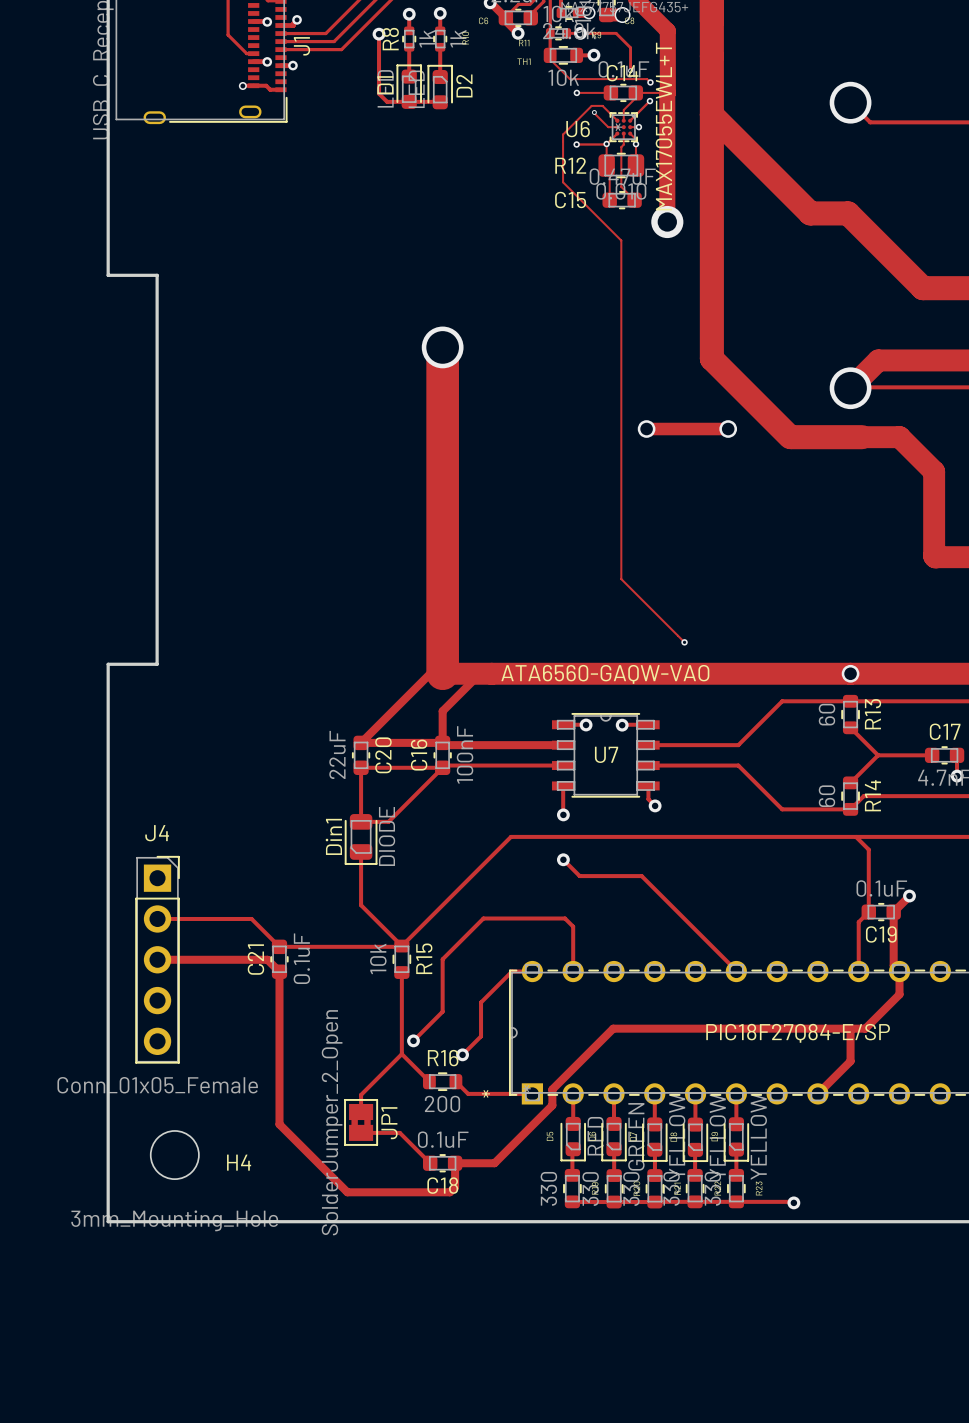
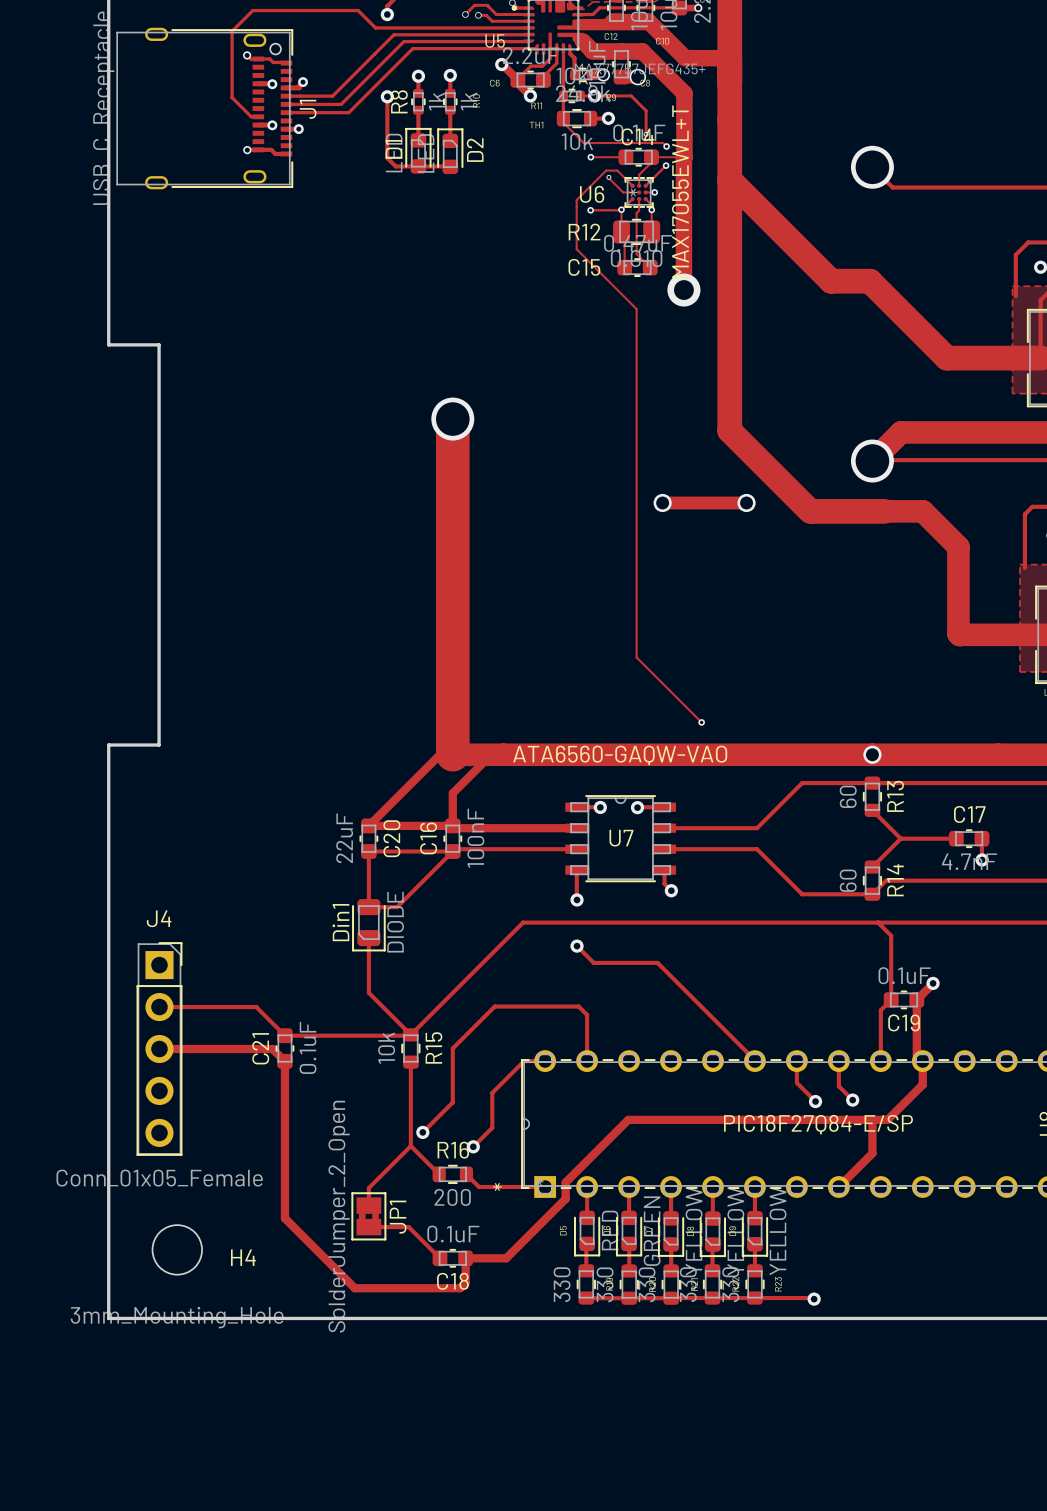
track: none -> (796, 1061) (796, 1082) (815, 1101)
track: none -> (838, 1061) (838, 1086) (852, 1100)
via: none -> (852, 1100)
via: none -> (815, 1101)

